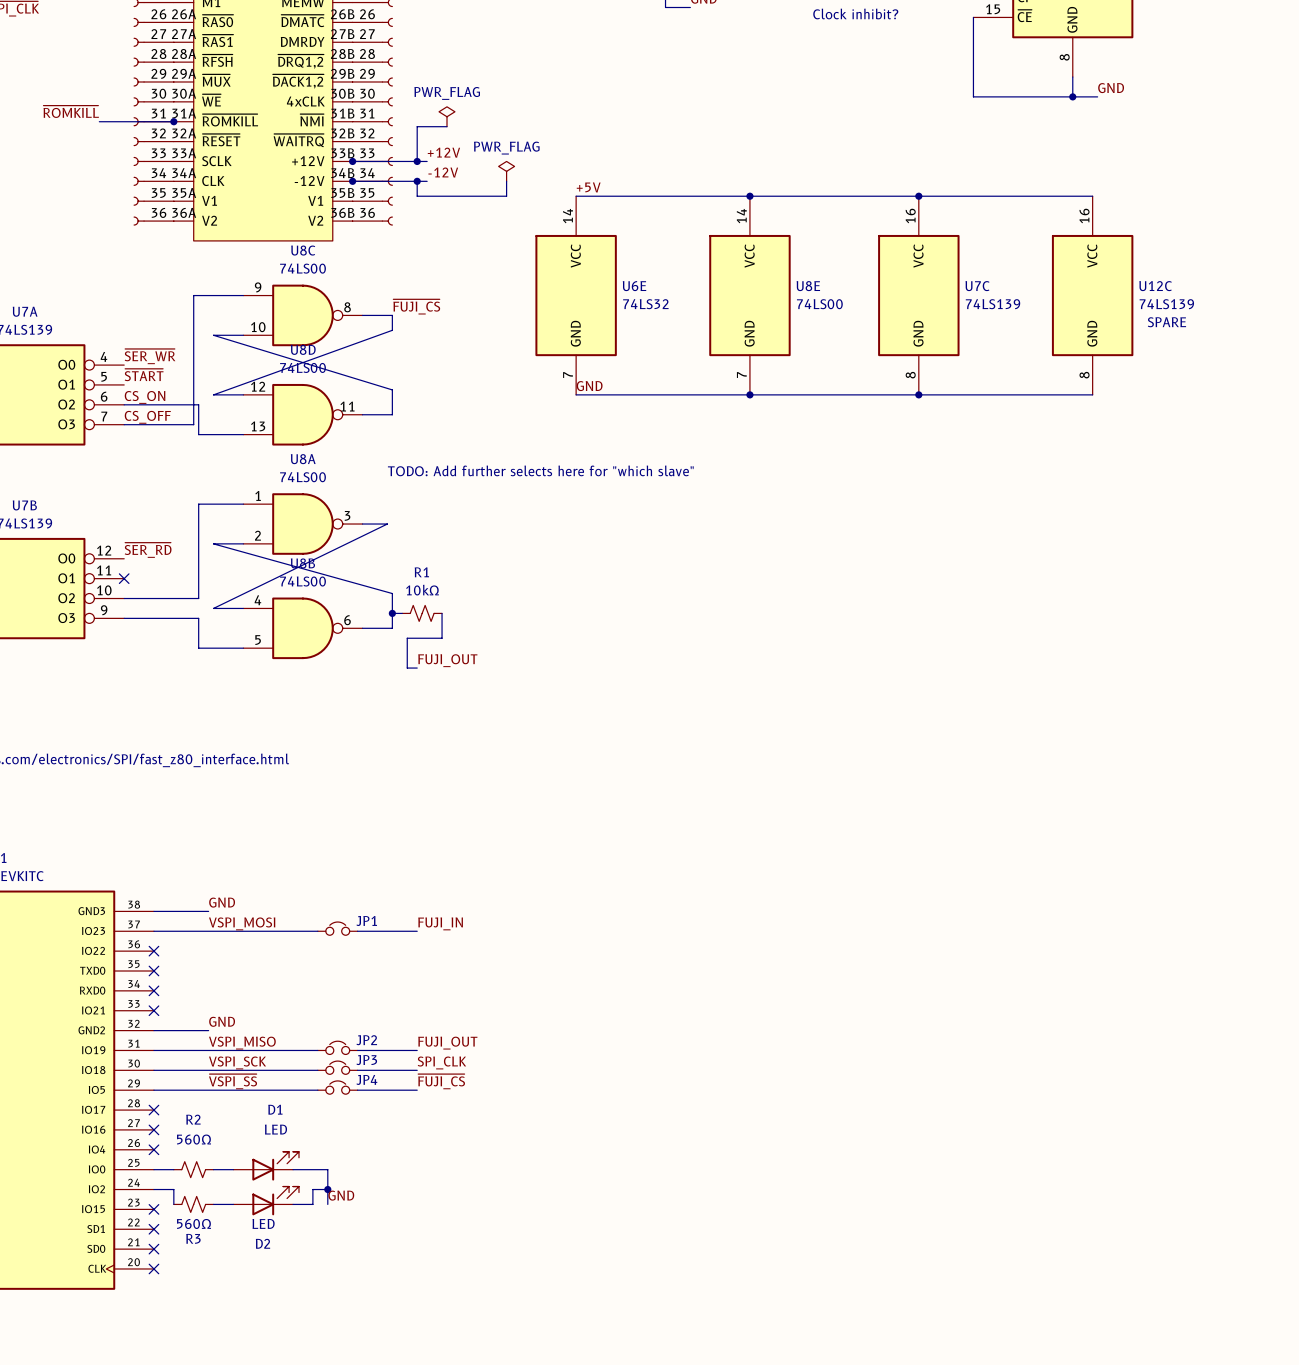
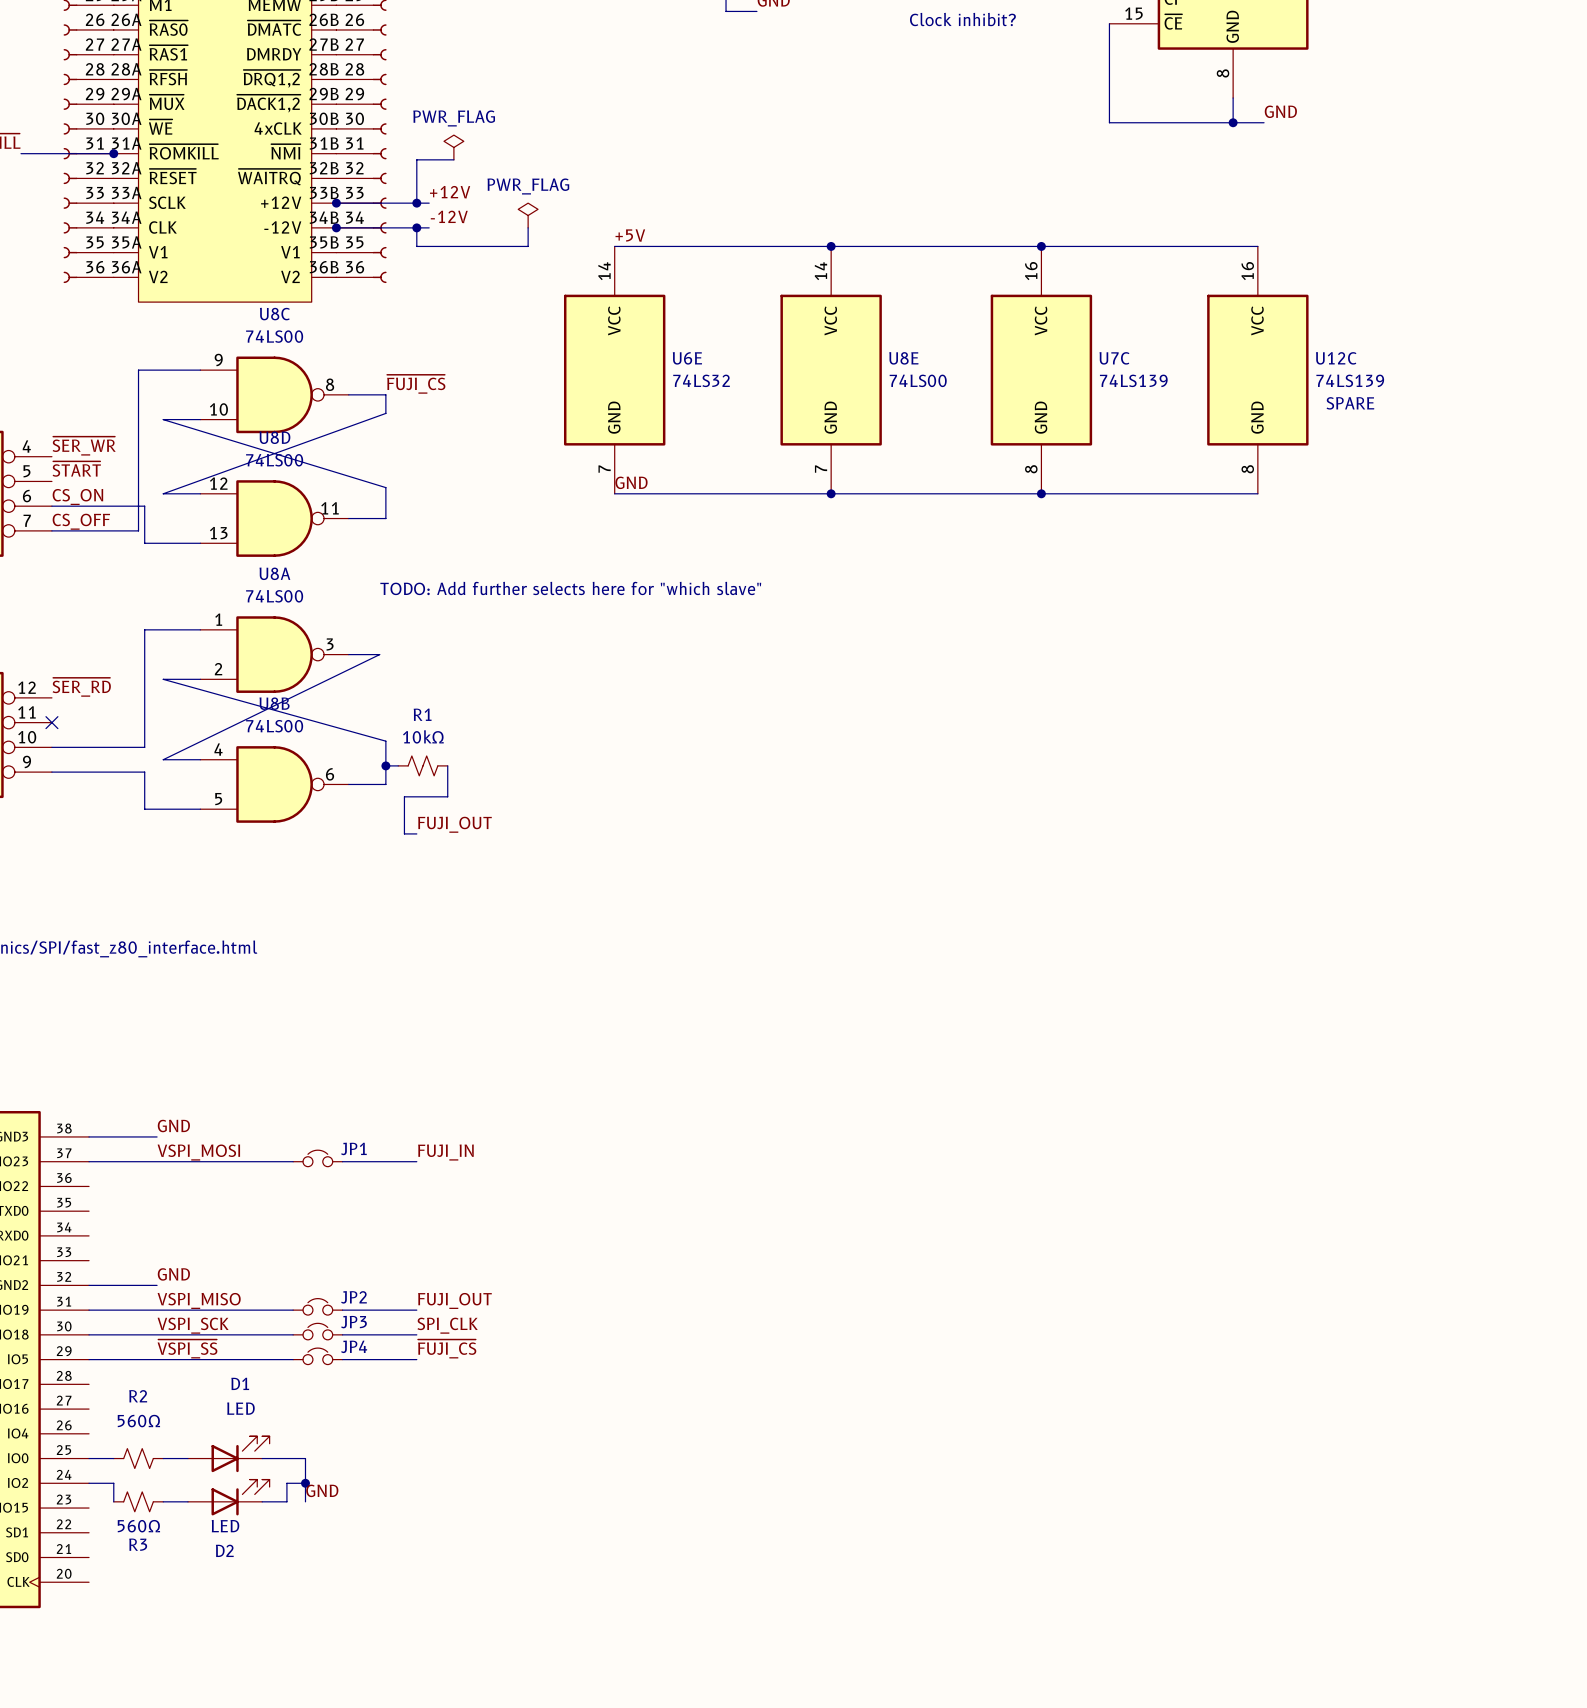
no-connect mark: (153, 951) -> none
no-connect mark: (153, 971) -> none
no-connect mark: (153, 990) -> none
no-connect mark: (153, 1010) -> none
no-connect mark: (153, 1110) -> none
no-connect mark: (153, 1129) -> none
no-connect mark: (153, 1149) -> none
no-connect mark: (153, 1209) -> none
no-connect mark: (153, 1229) -> none
no-connect mark: (153, 1249) -> none
no-connect mark: (153, 1268) -> none

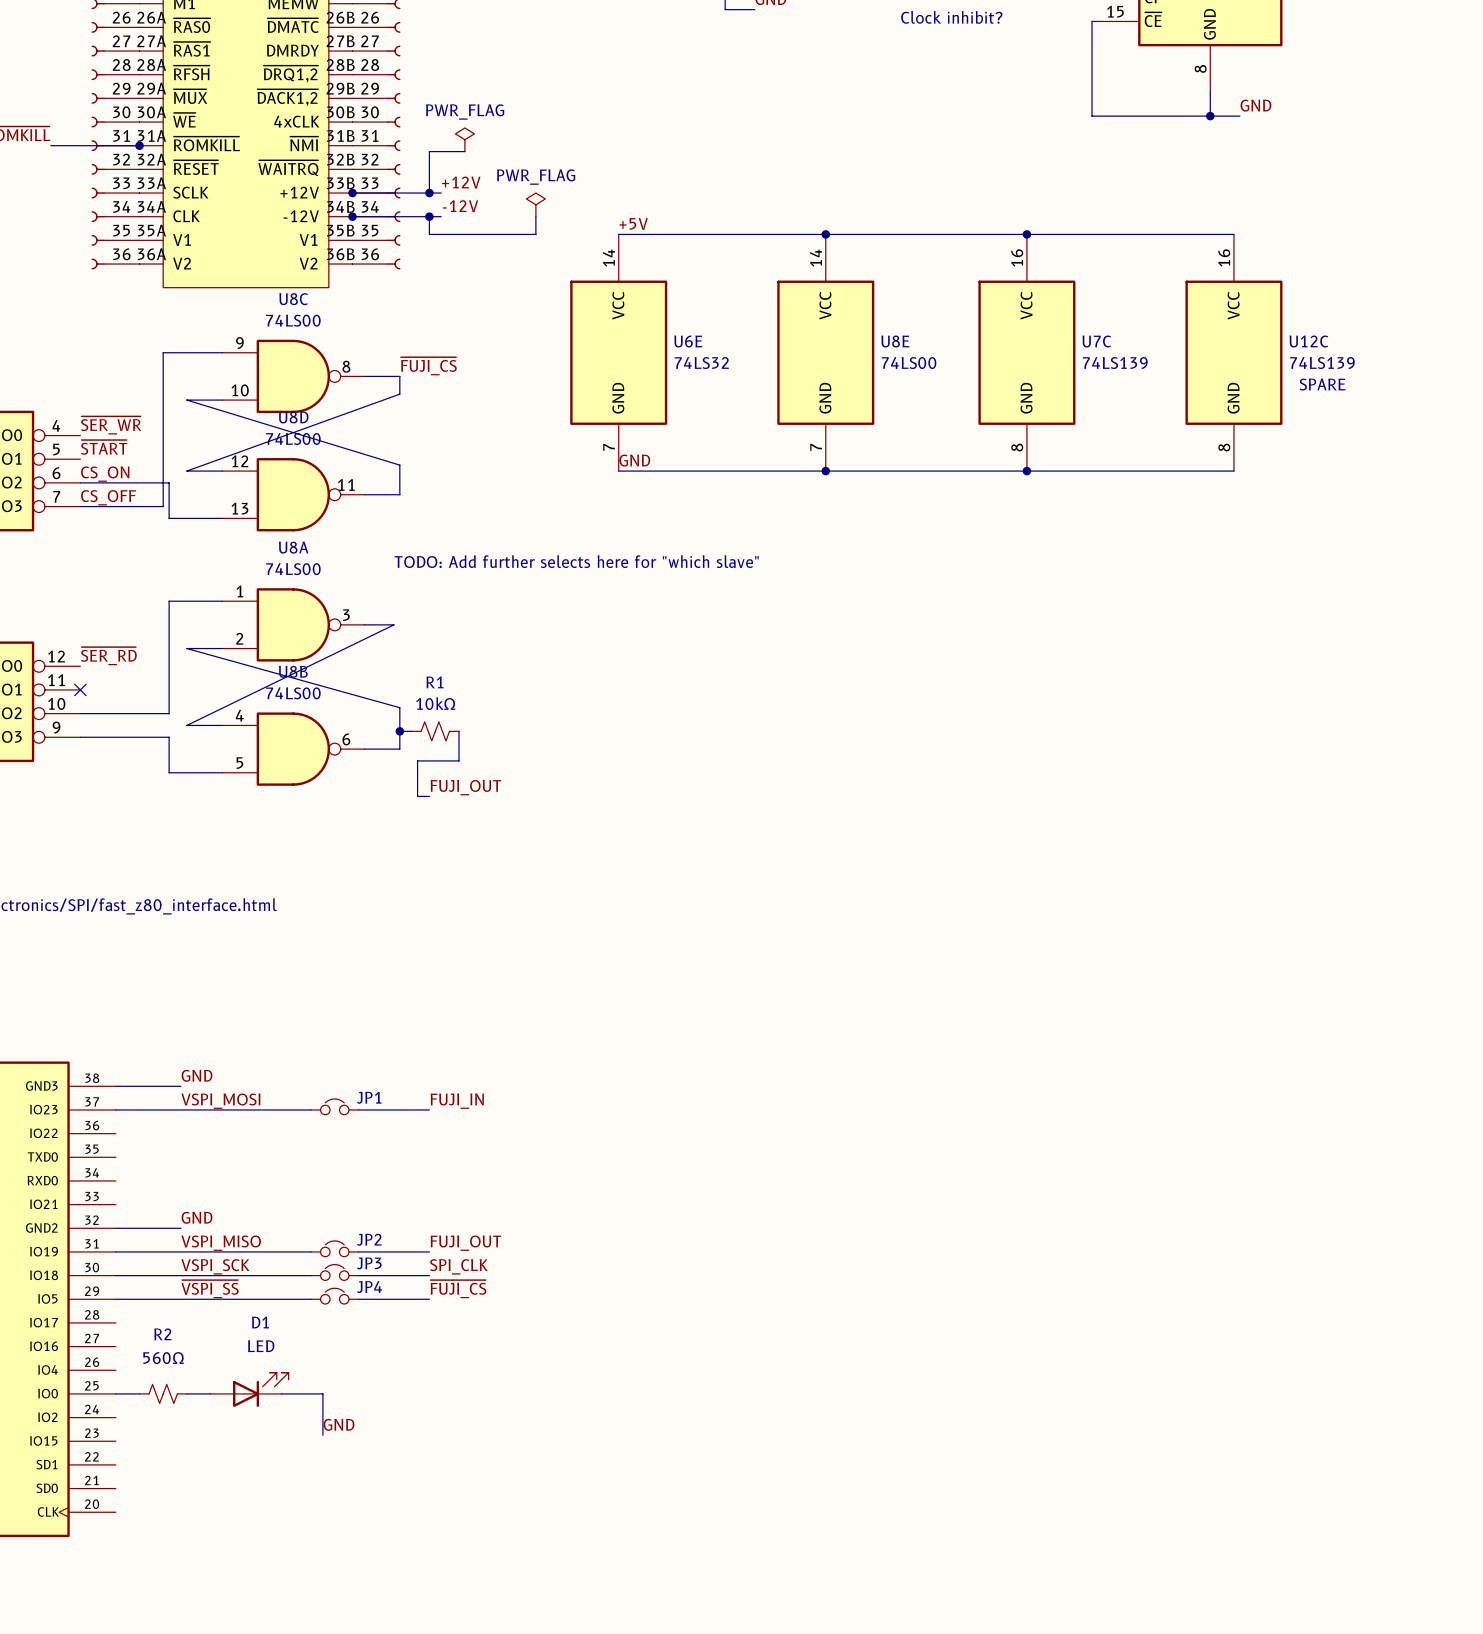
wire: (89, 1483) (113, 1483) (113, 1501) -> none
wire: (305, 1483) (286, 1483) (286, 1501) (262, 1501) -> none
junction: (305, 1483) -> none
D2: LED (228, 1497) -> none
R3: 560Ω (138, 1501) -> none
wire: (163, 1501) (187, 1501) -> none

